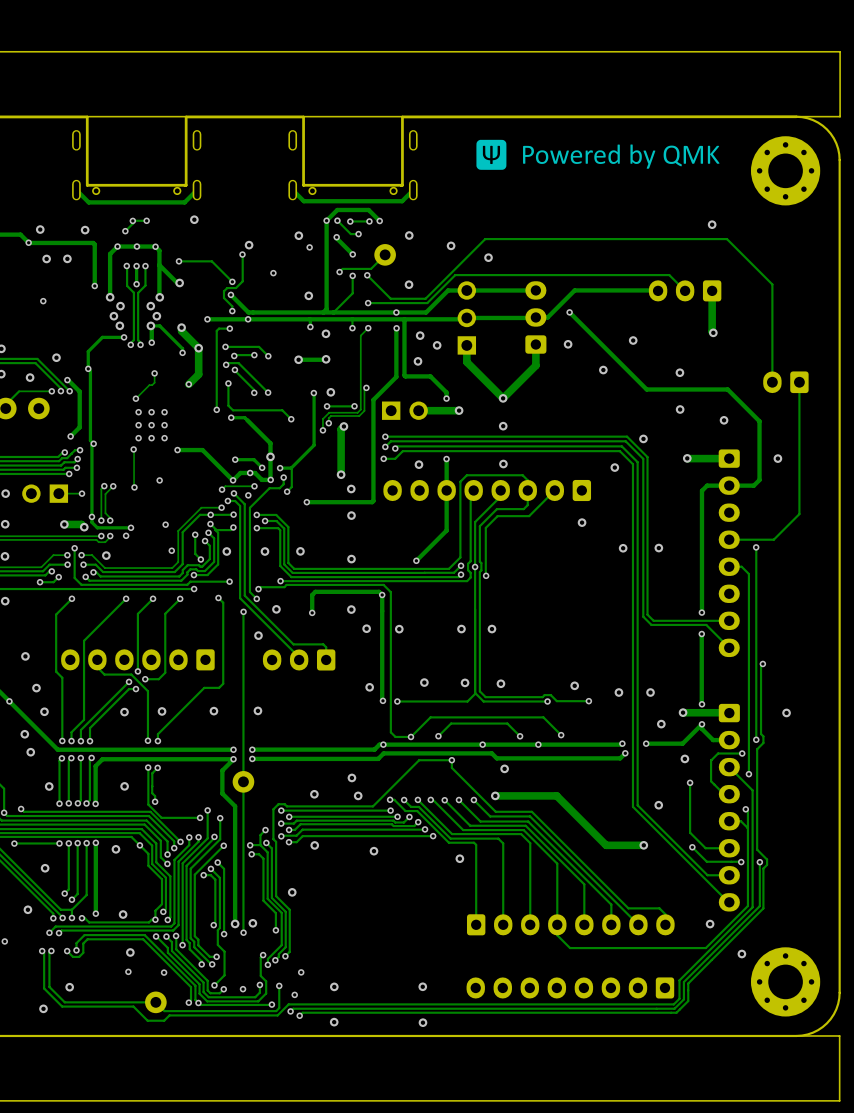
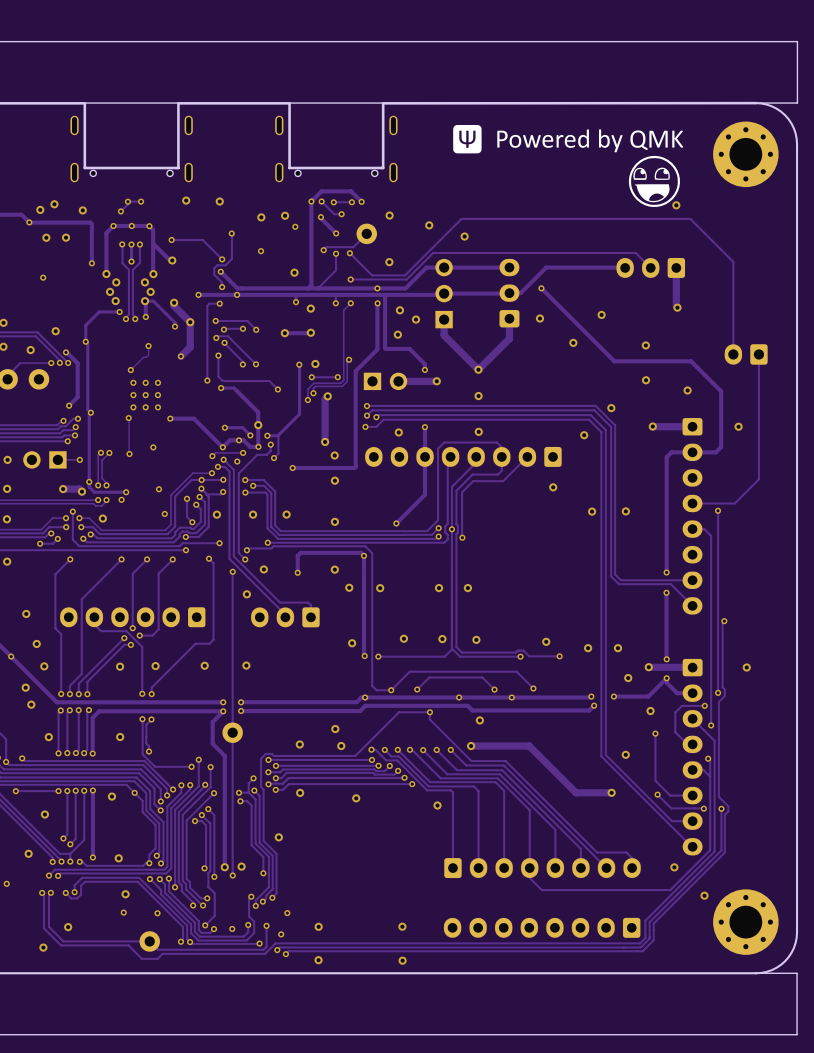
drawing: none -> [628, 155, 680, 207]
track: (197, 190) (184, 202) (88, 202) (76, 190) -> none
track: (413, 190) (402, 201) (303, 201) (292, 190) -> none
via: none -> (219, 201)
via: none -> (54, 204)
via: none -> (261, 217)
via: (249, 245) -> none

